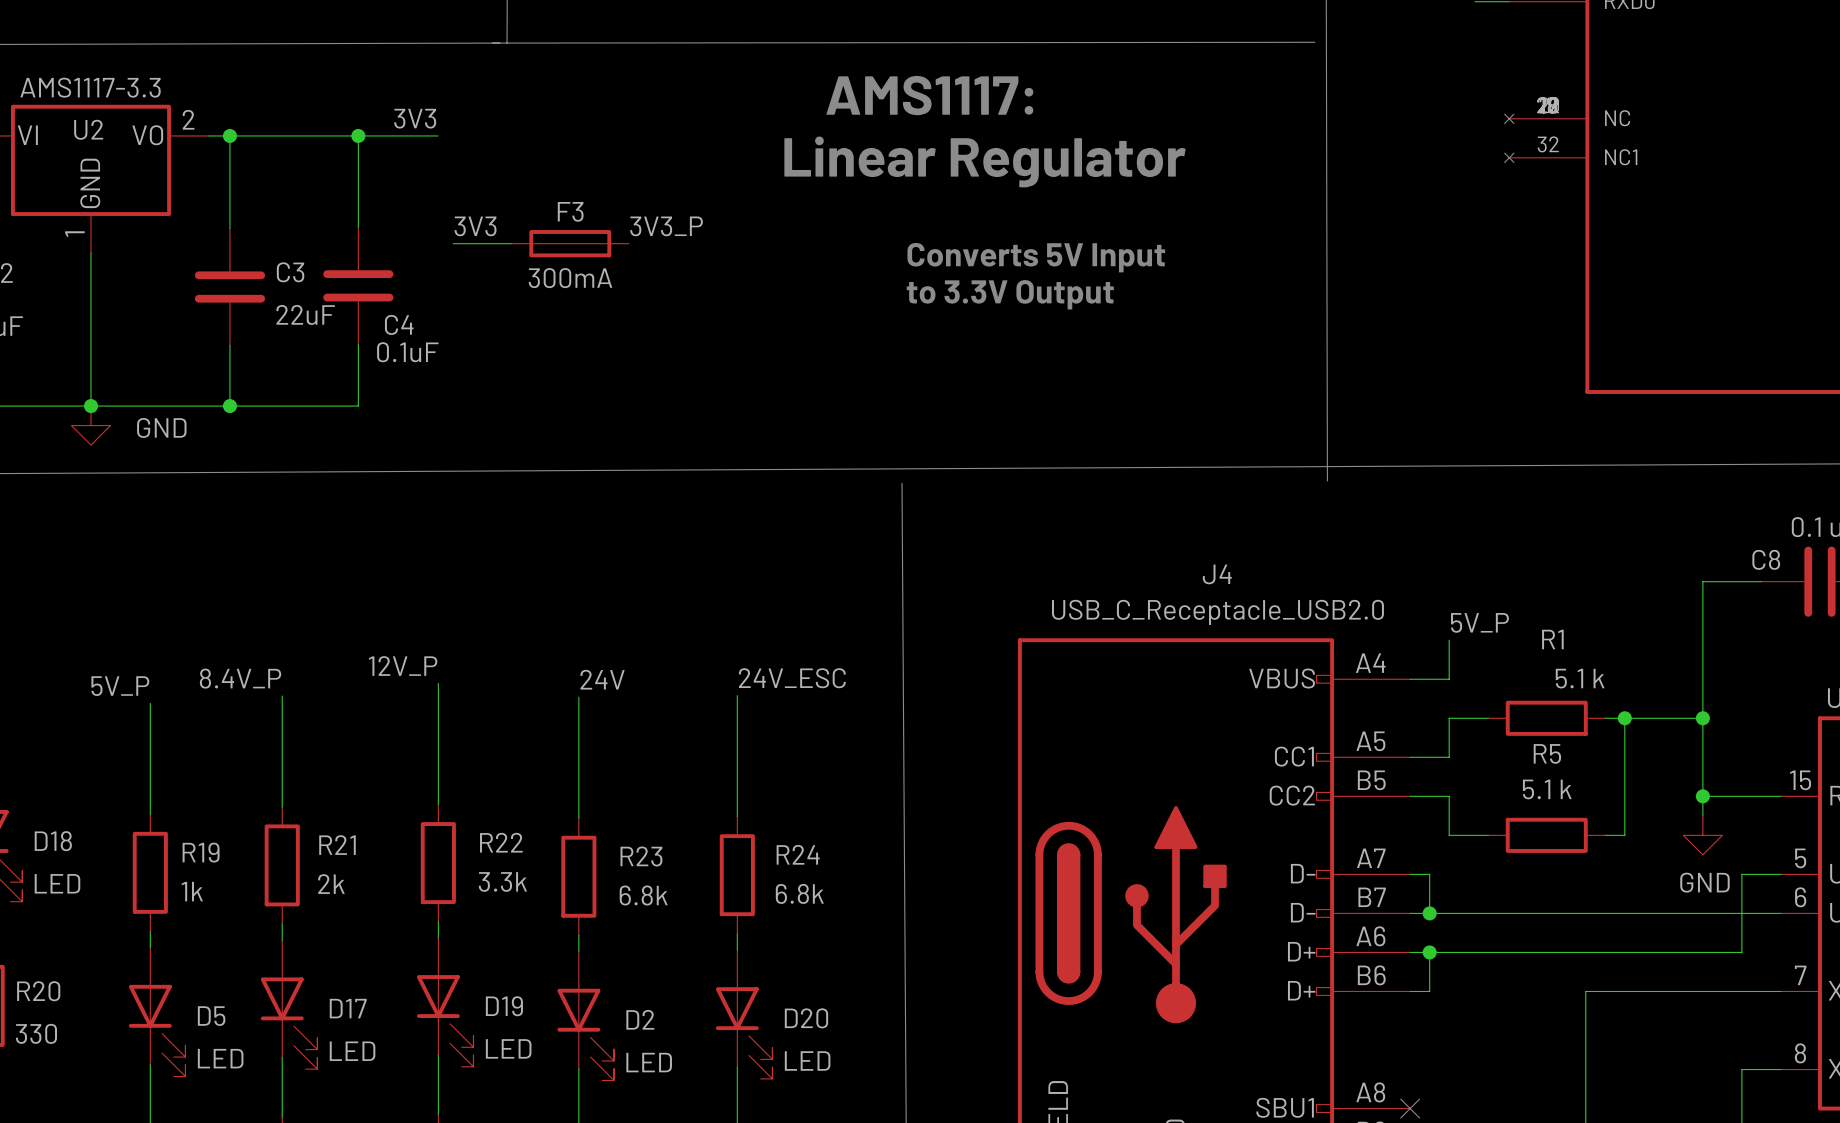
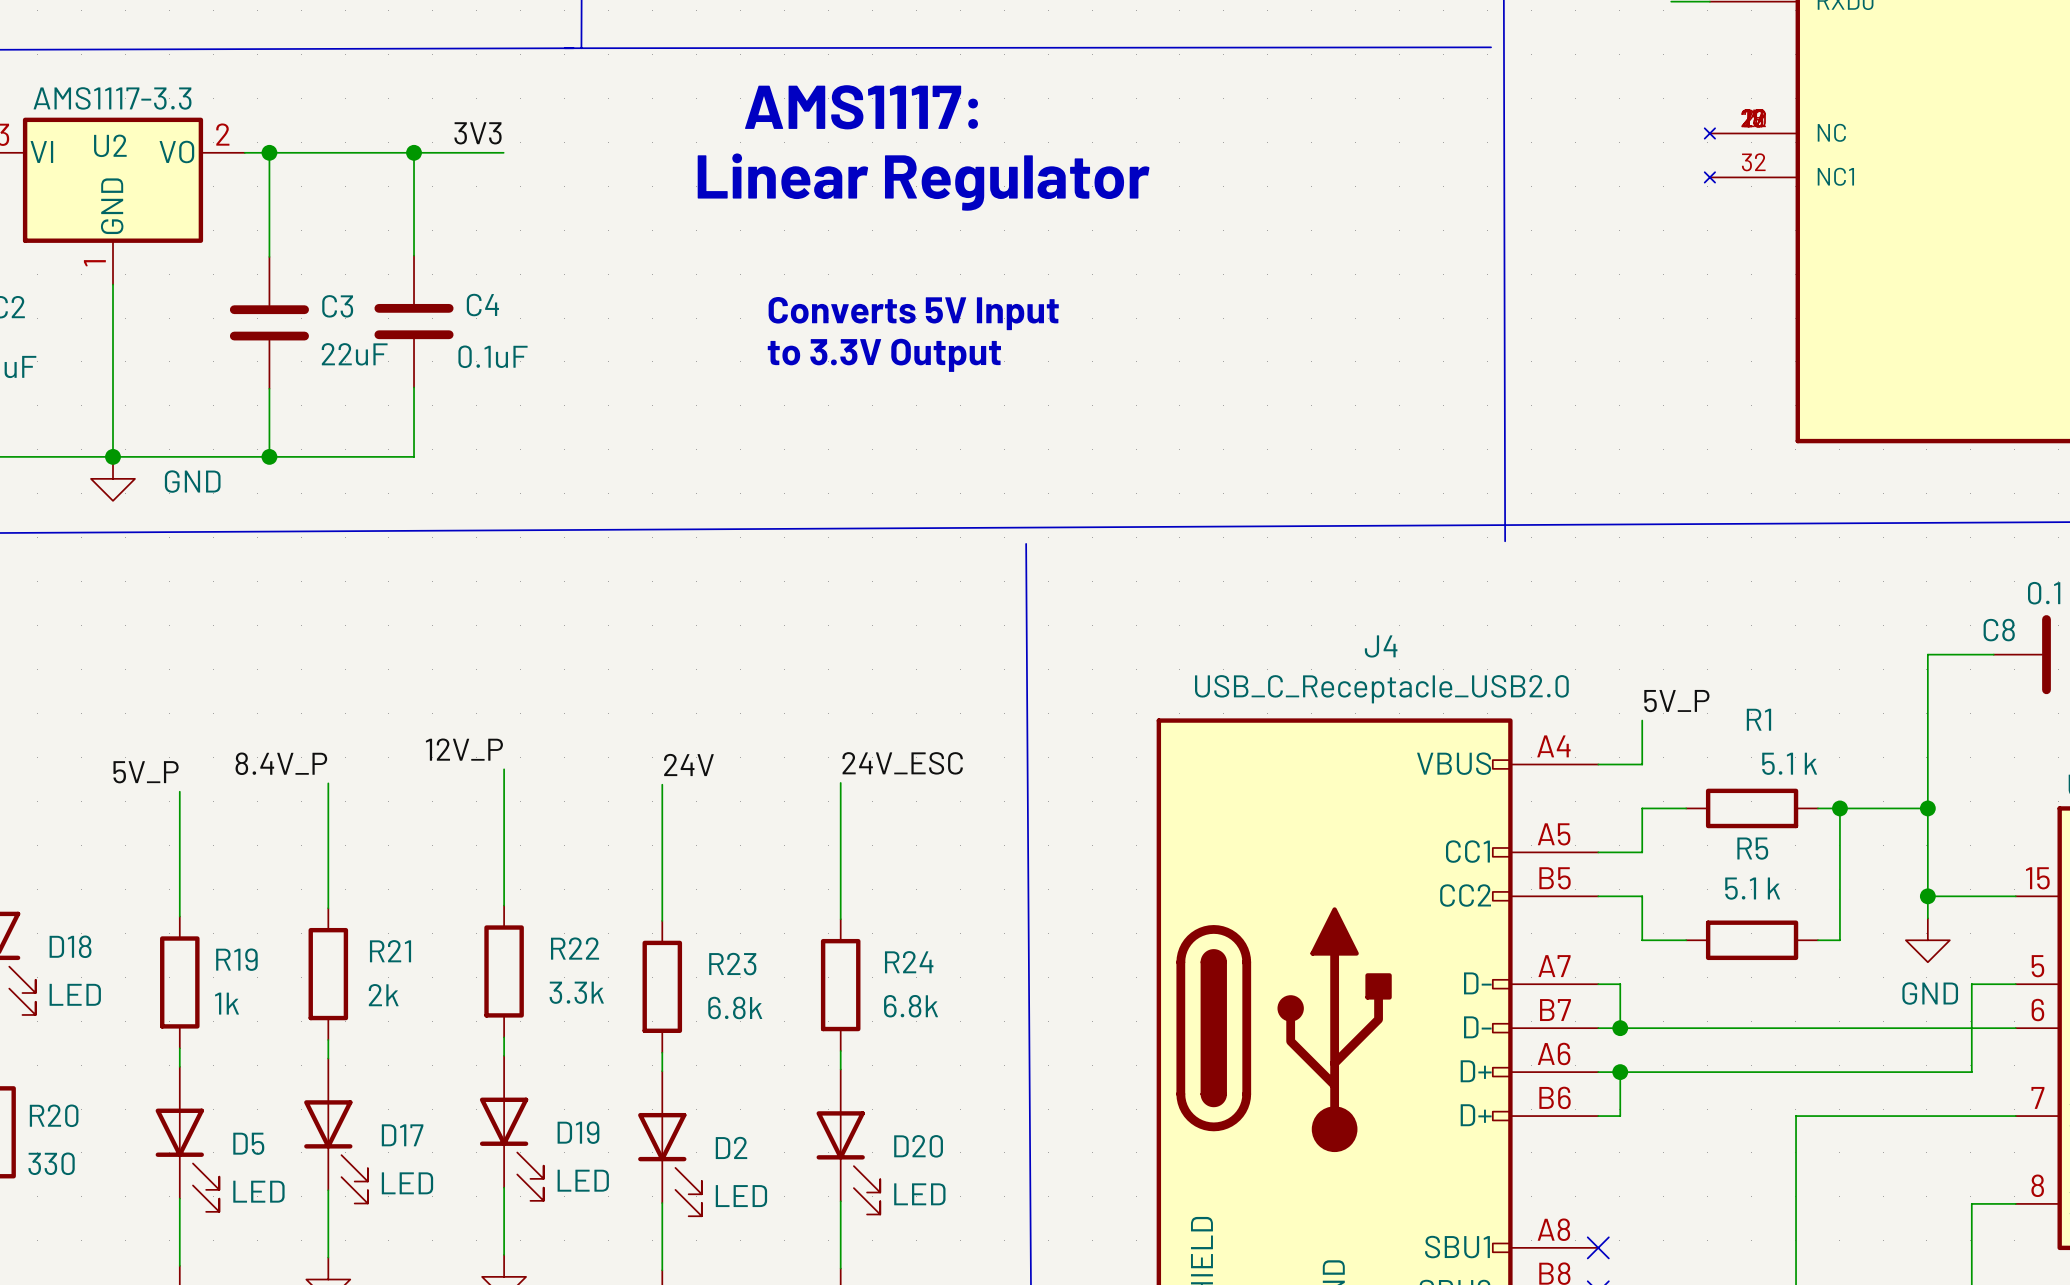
text position: AMS1117: (929, 95) -> AMS1117: (861, 107)
text position: Linear Regulator (985, 161) -> Linear Regulator (923, 182)
label: 3V3 (475, 226) -> none
label: 3V3_P (666, 226) -> none
wire: (453, 243) (511, 243) -> none
F3: 300mA (570, 243) -> none
text position: Converts 5V Input (1036, 257) -> Converts 5V Input (913, 313)
text position: to 3.3V Output (1010, 294) -> to 3.3V Output (884, 355)
C4 name position: C4 (399, 324) -> C4 (482, 305)
C4 value position: 0.1uF (407, 352) -> 0.1uF (493, 356)

